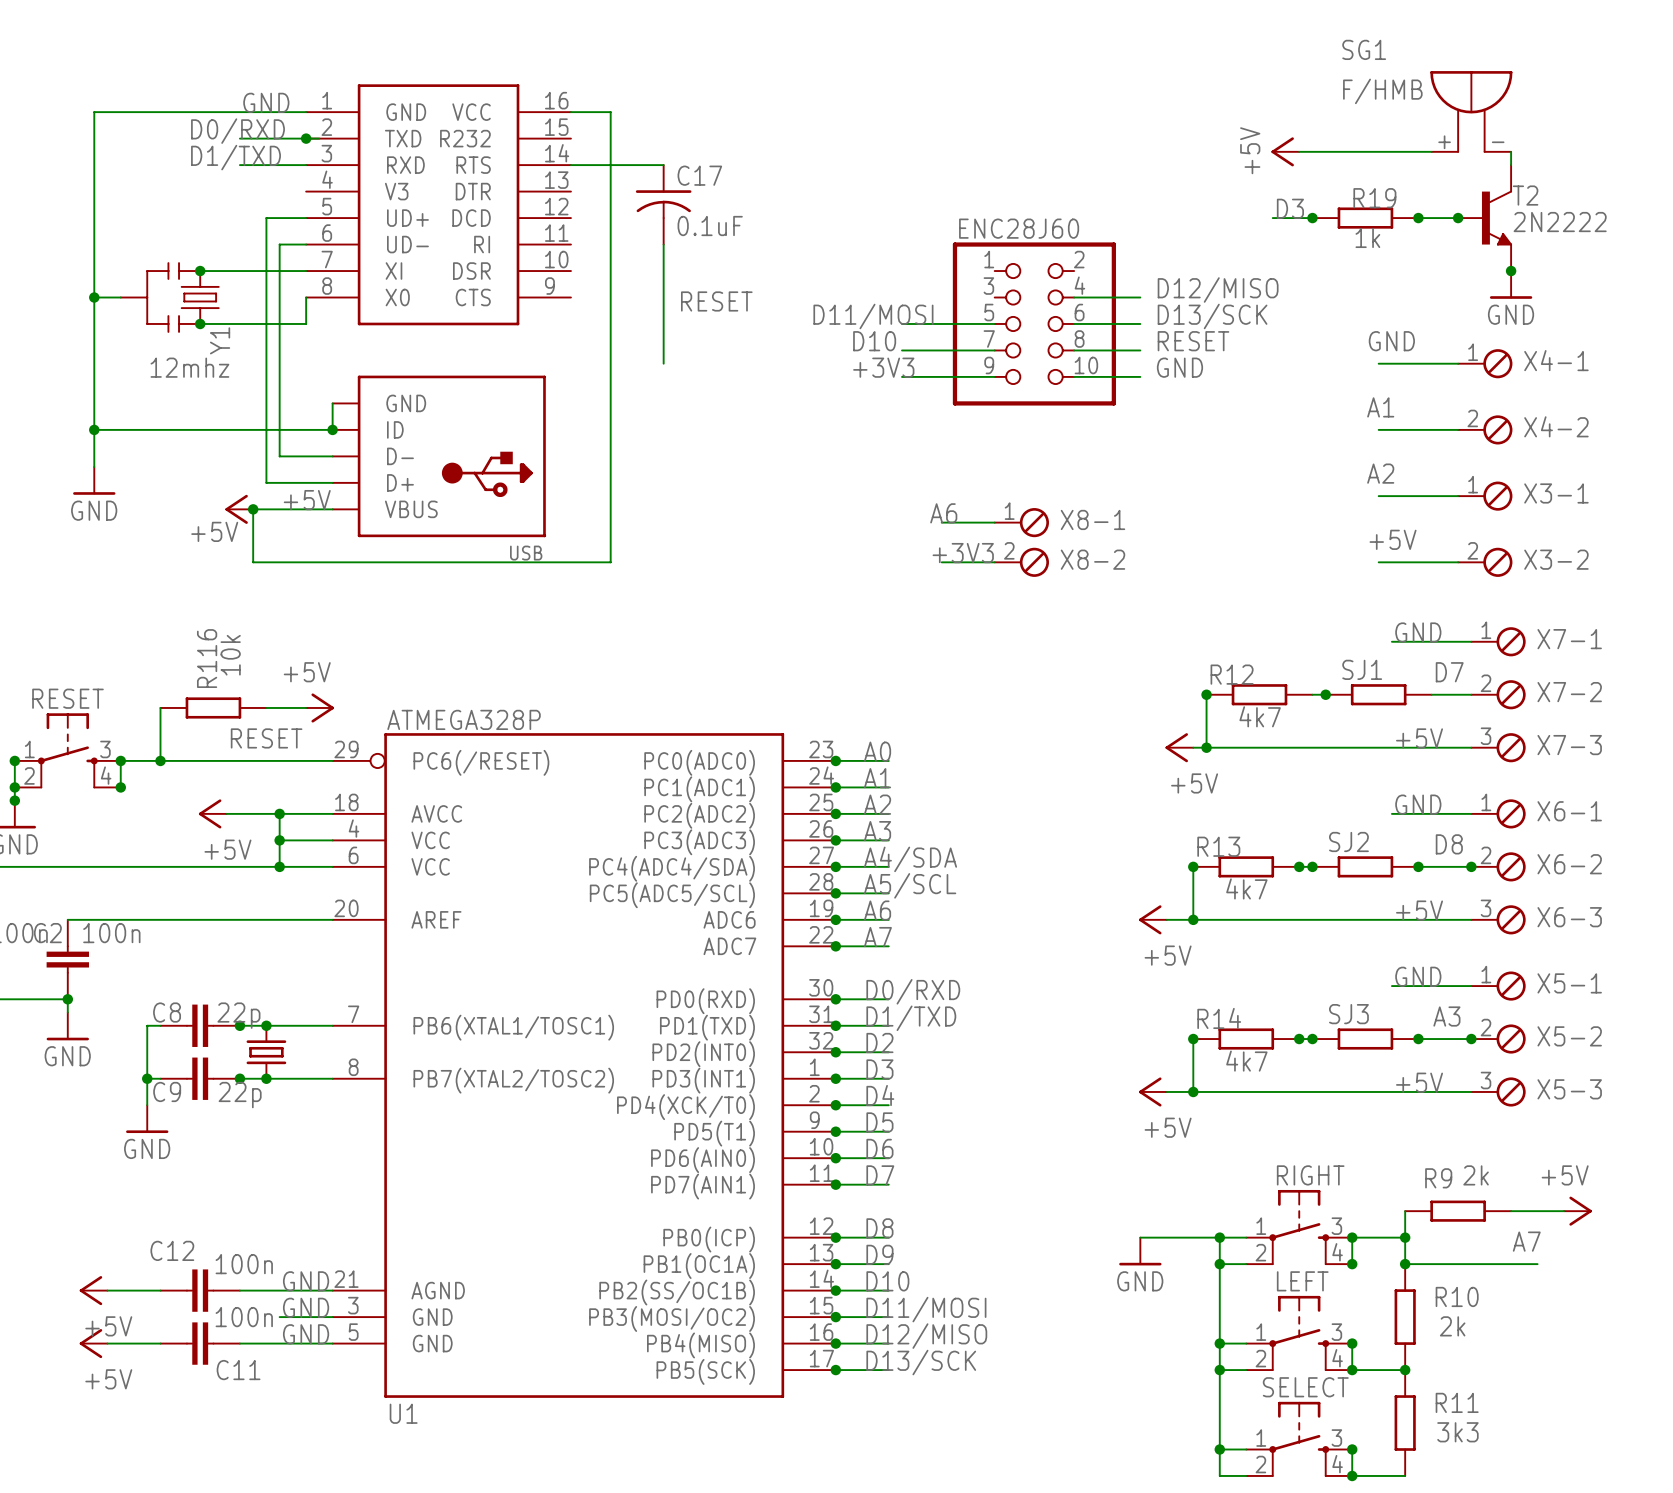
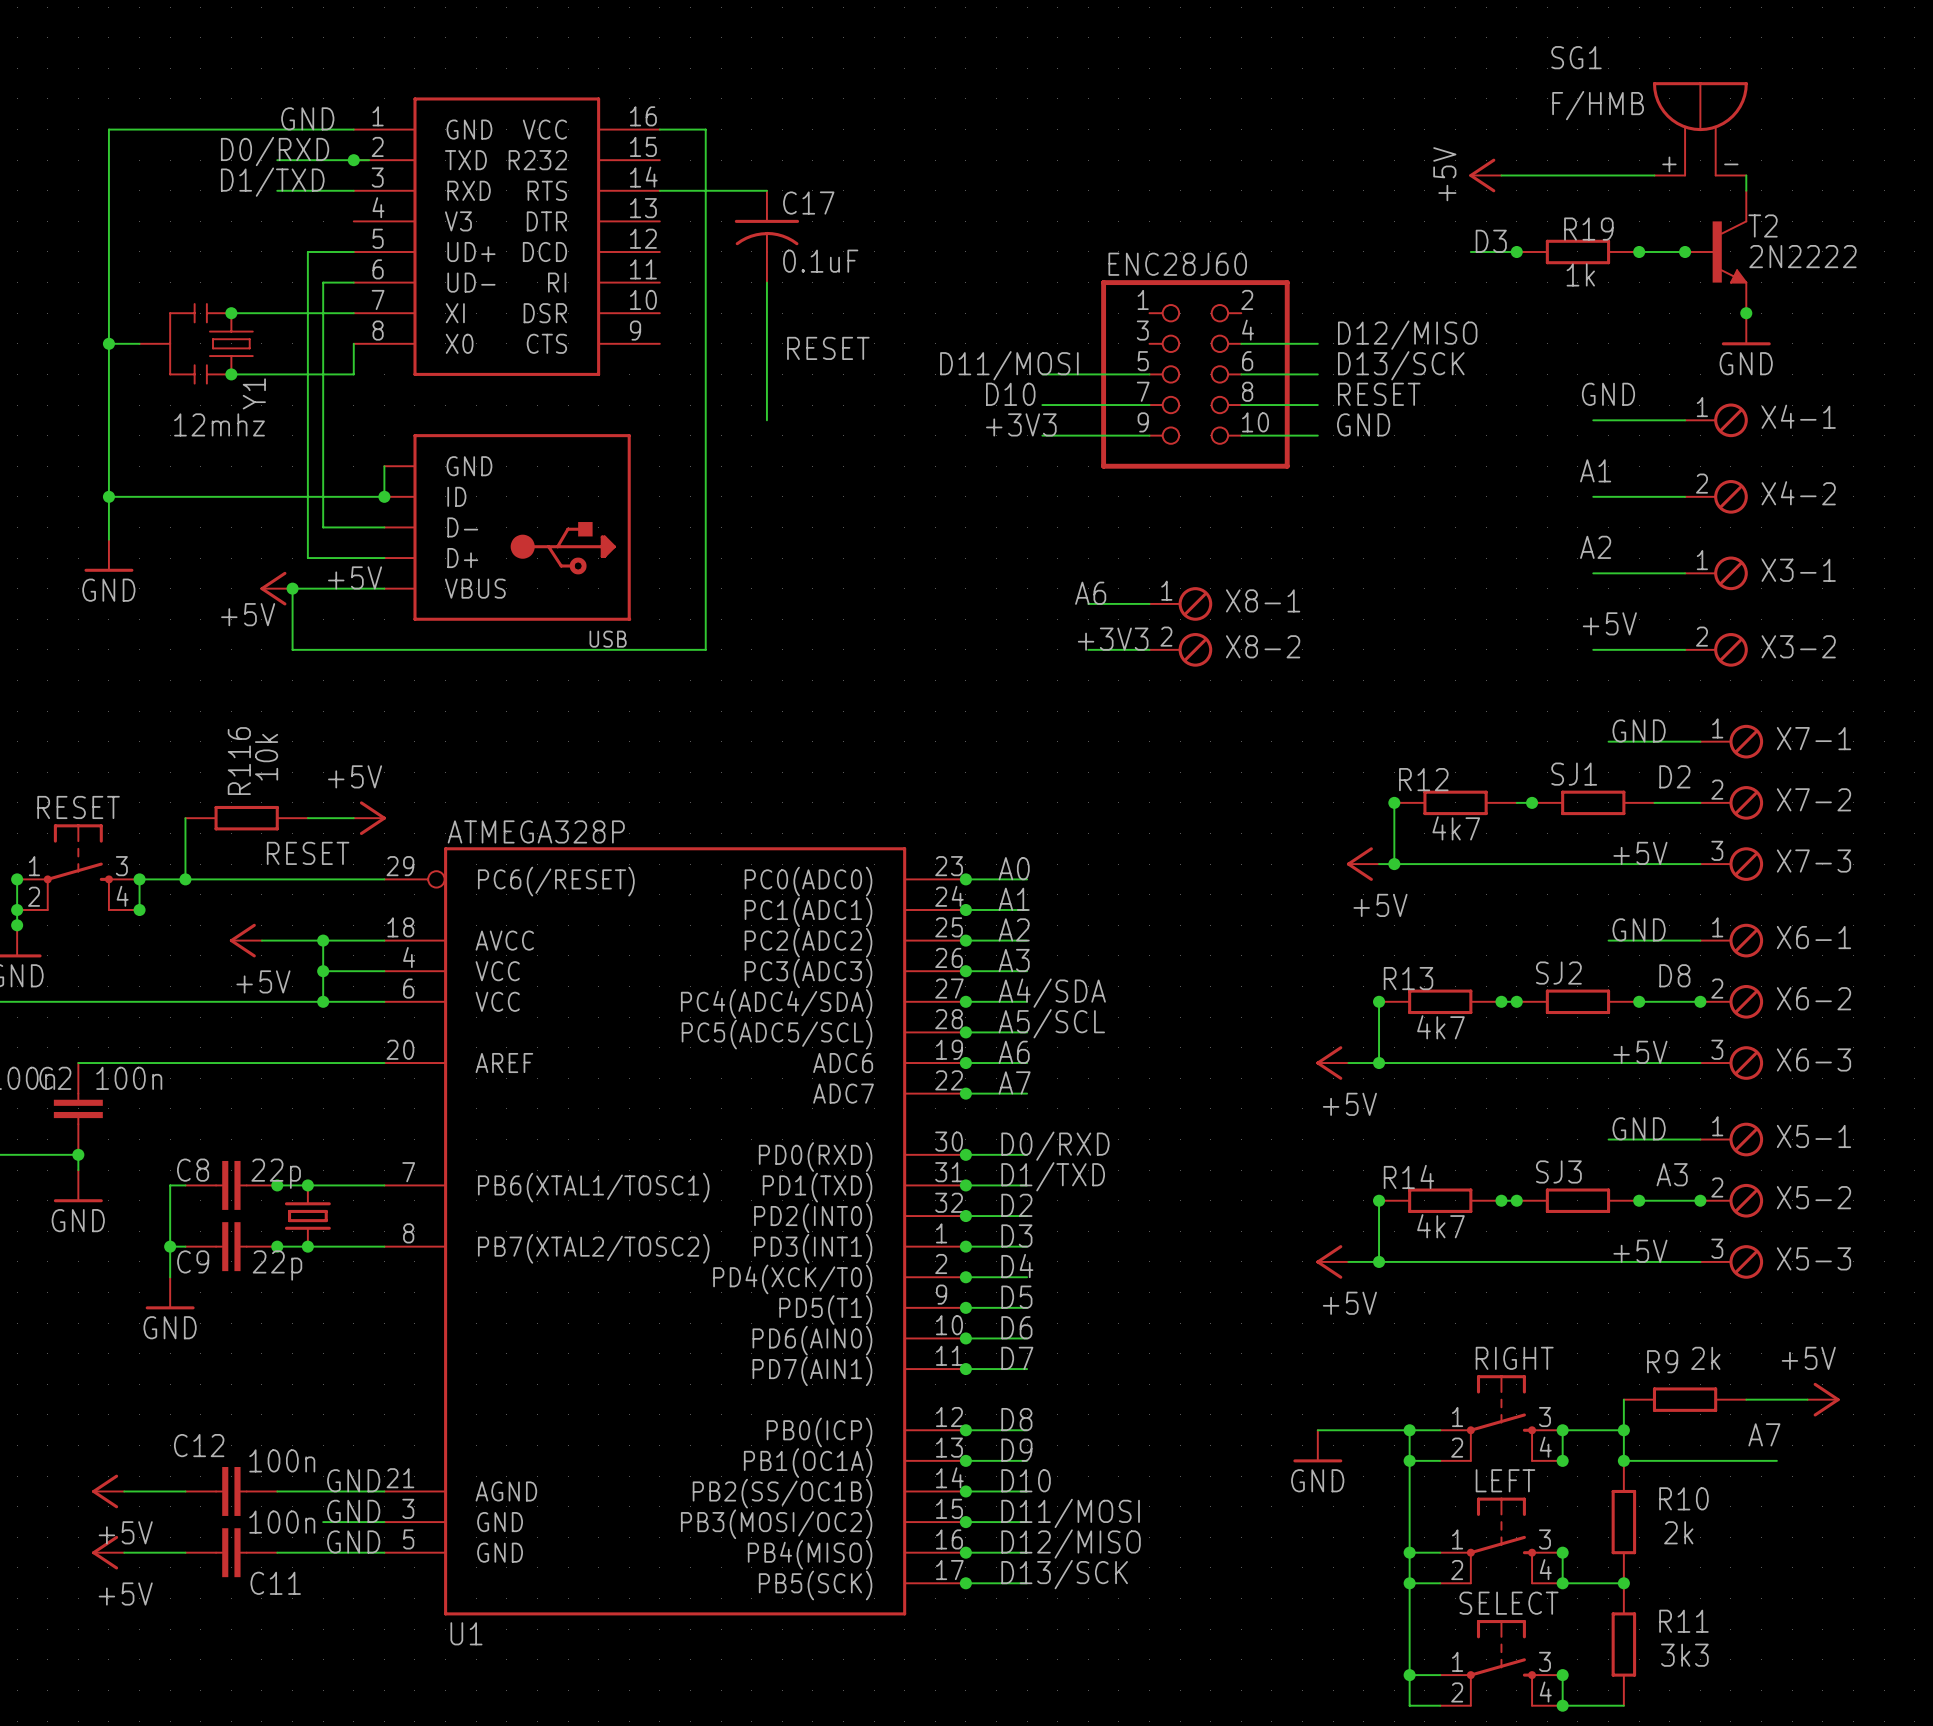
label: D7 (1449, 672) -> D2 (1674, 776)

